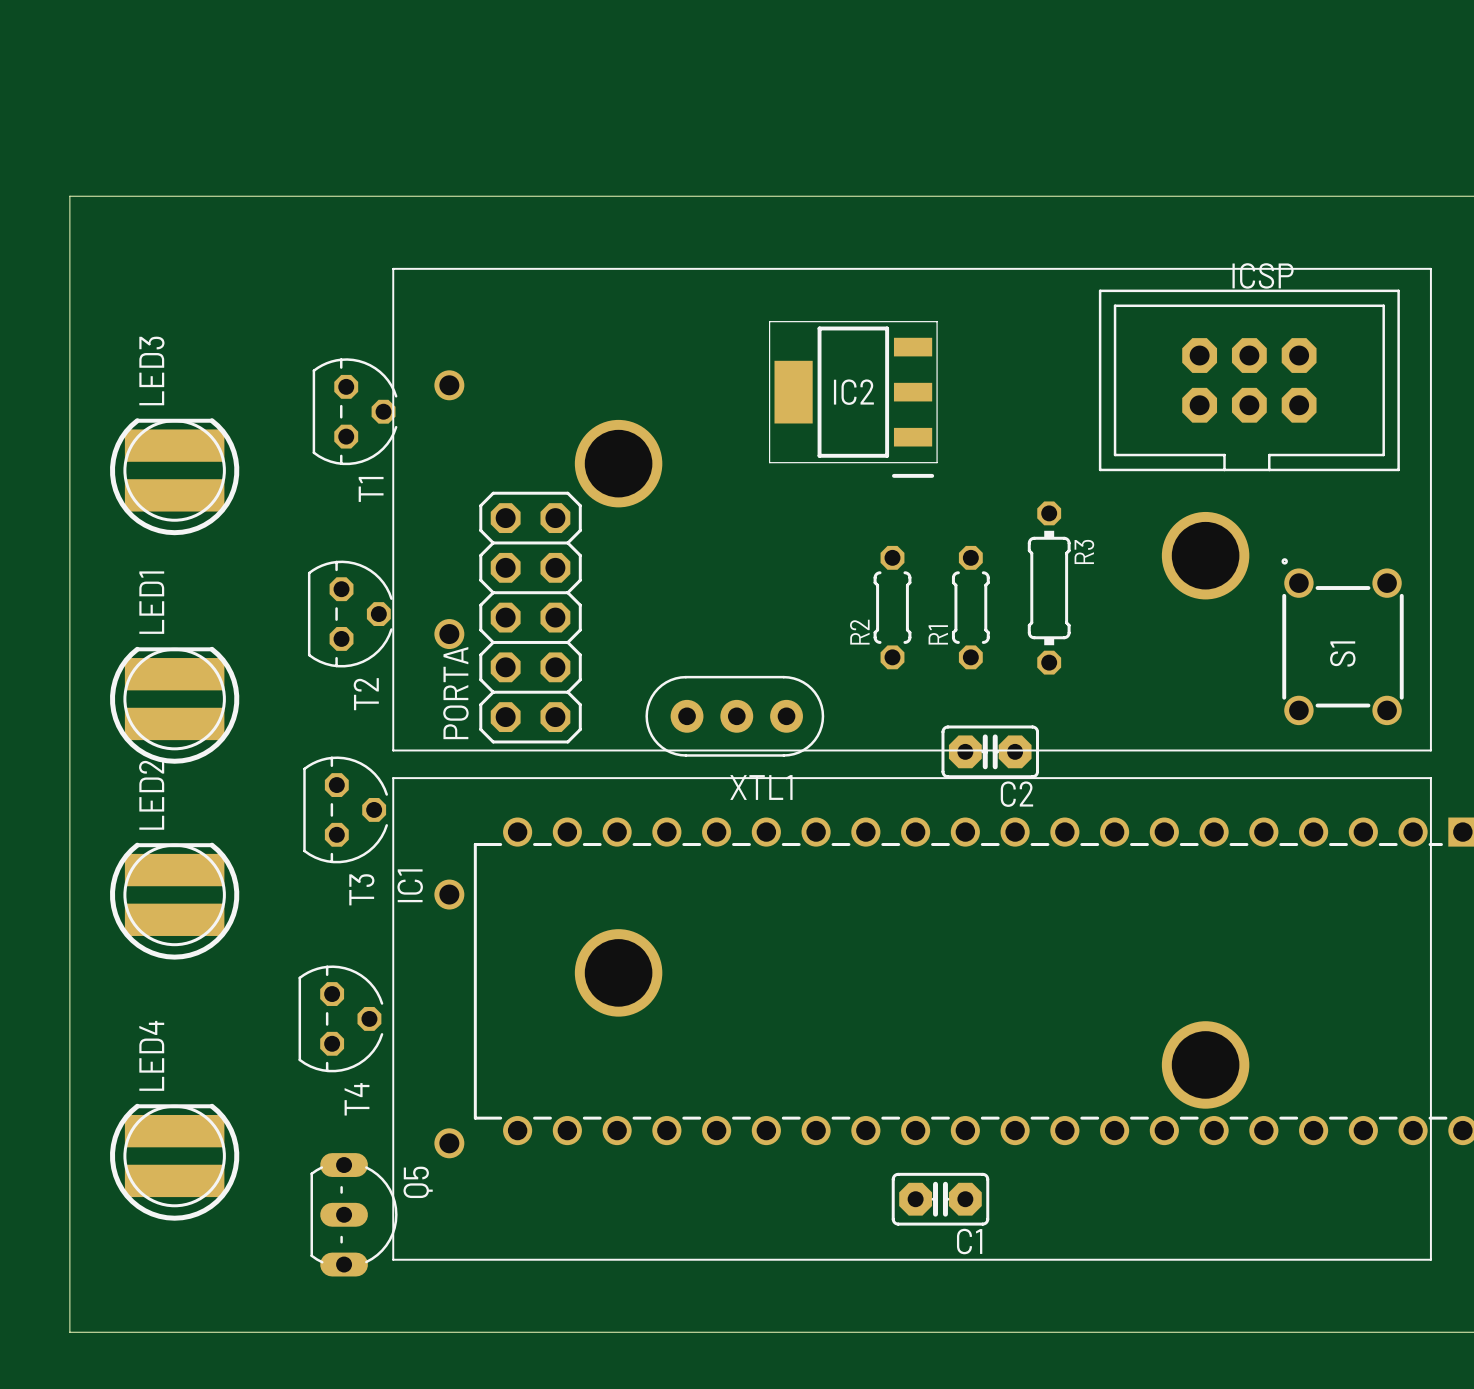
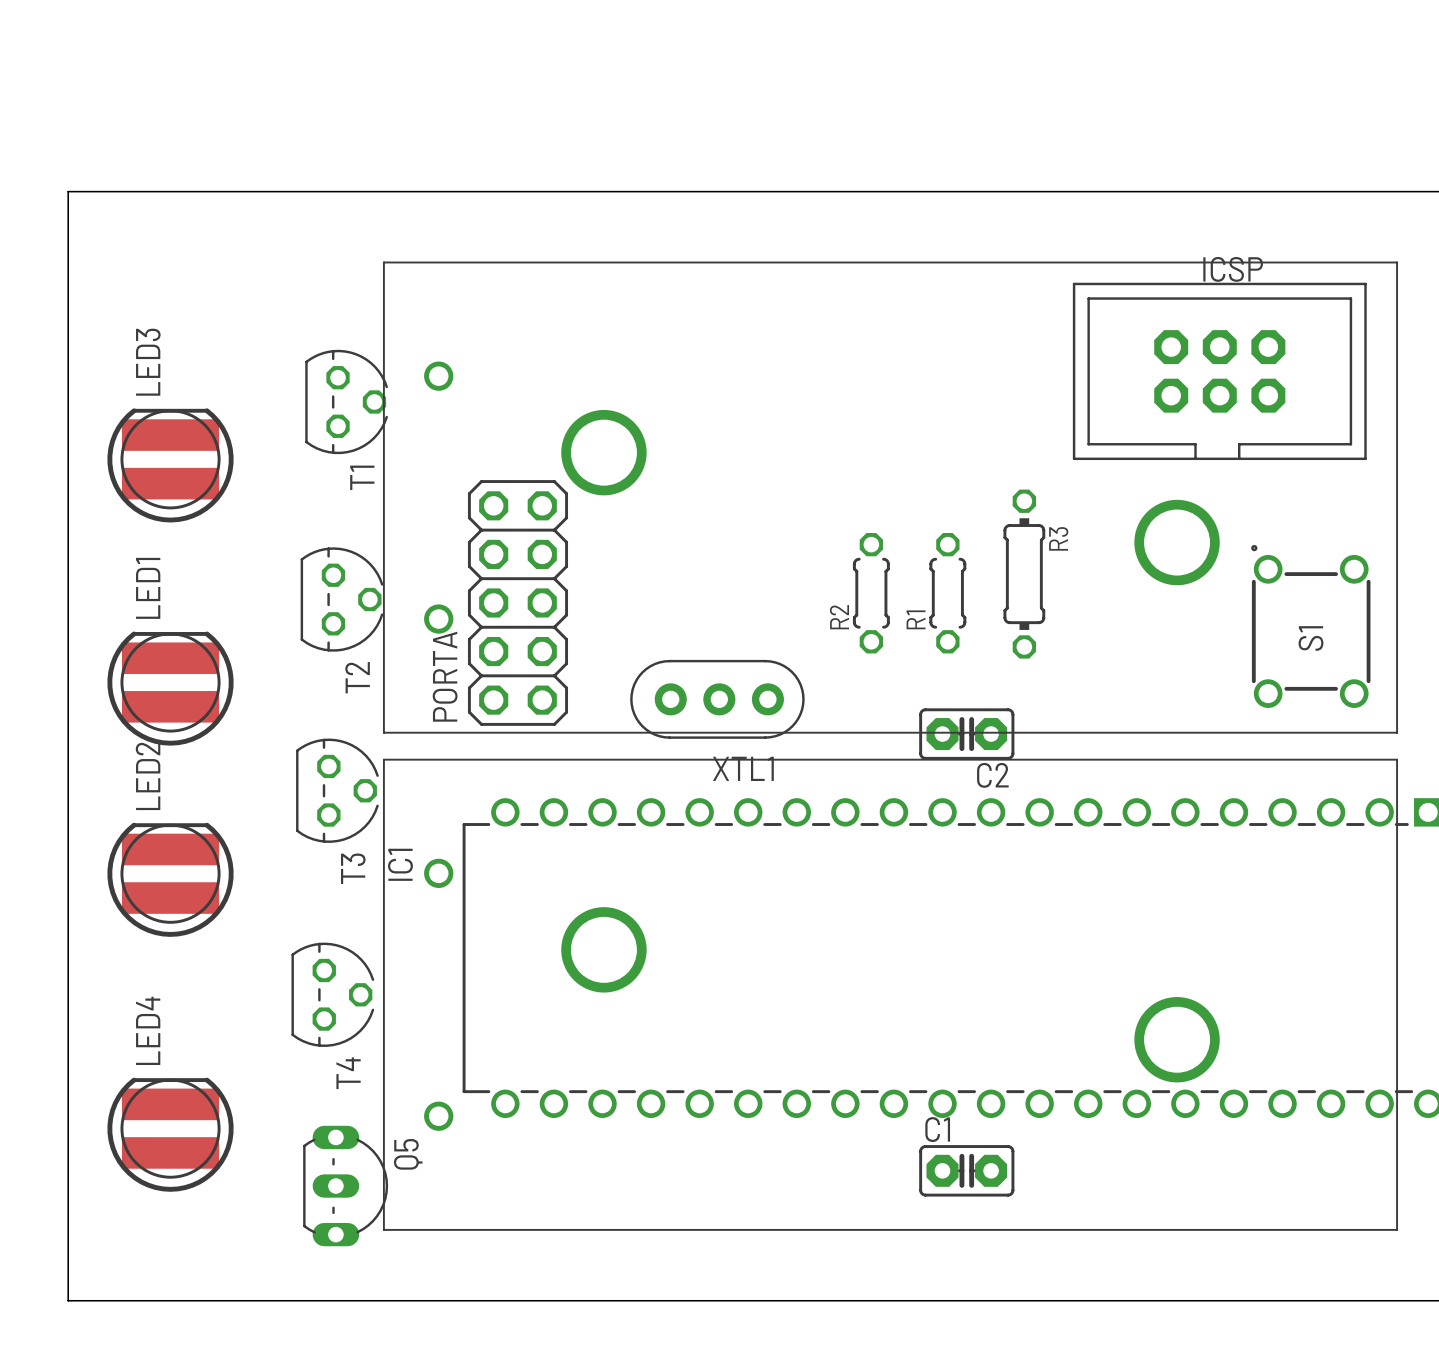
IC2: (853, 399) -> none
C1 position: (940, 1199) -> (966, 1170)
C1 name position: C1 (969, 1241) -> C1 (937, 1129)

